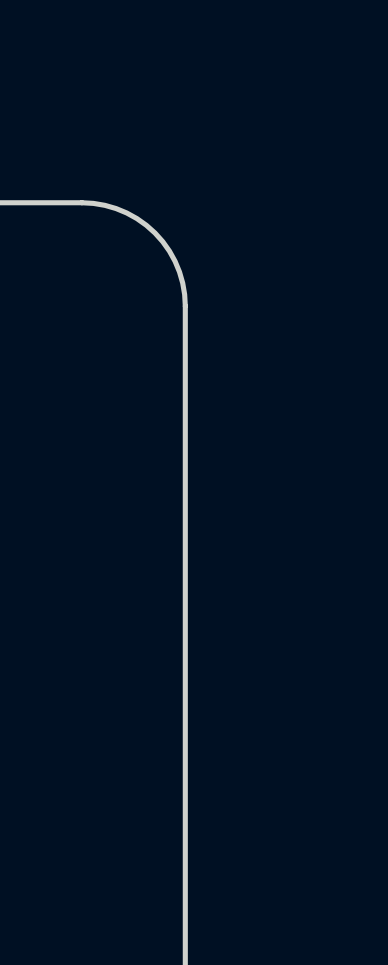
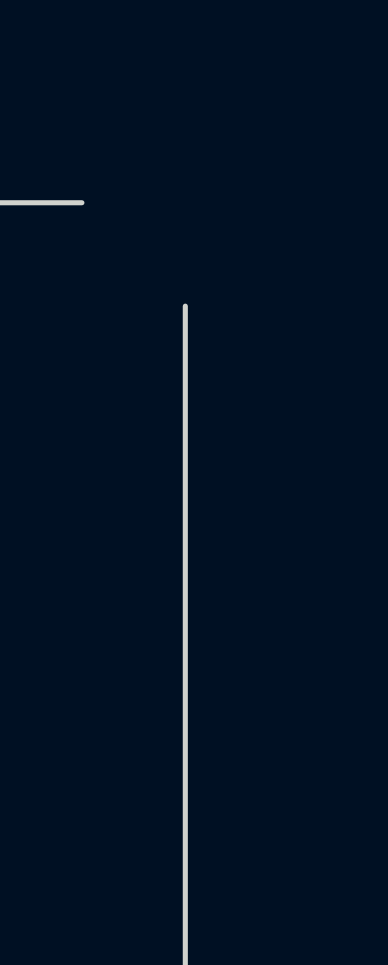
board edge: (81, 202) (116, 208) (136, 218) (155, 233) (169, 251) (179, 271) (185, 306) -> none

